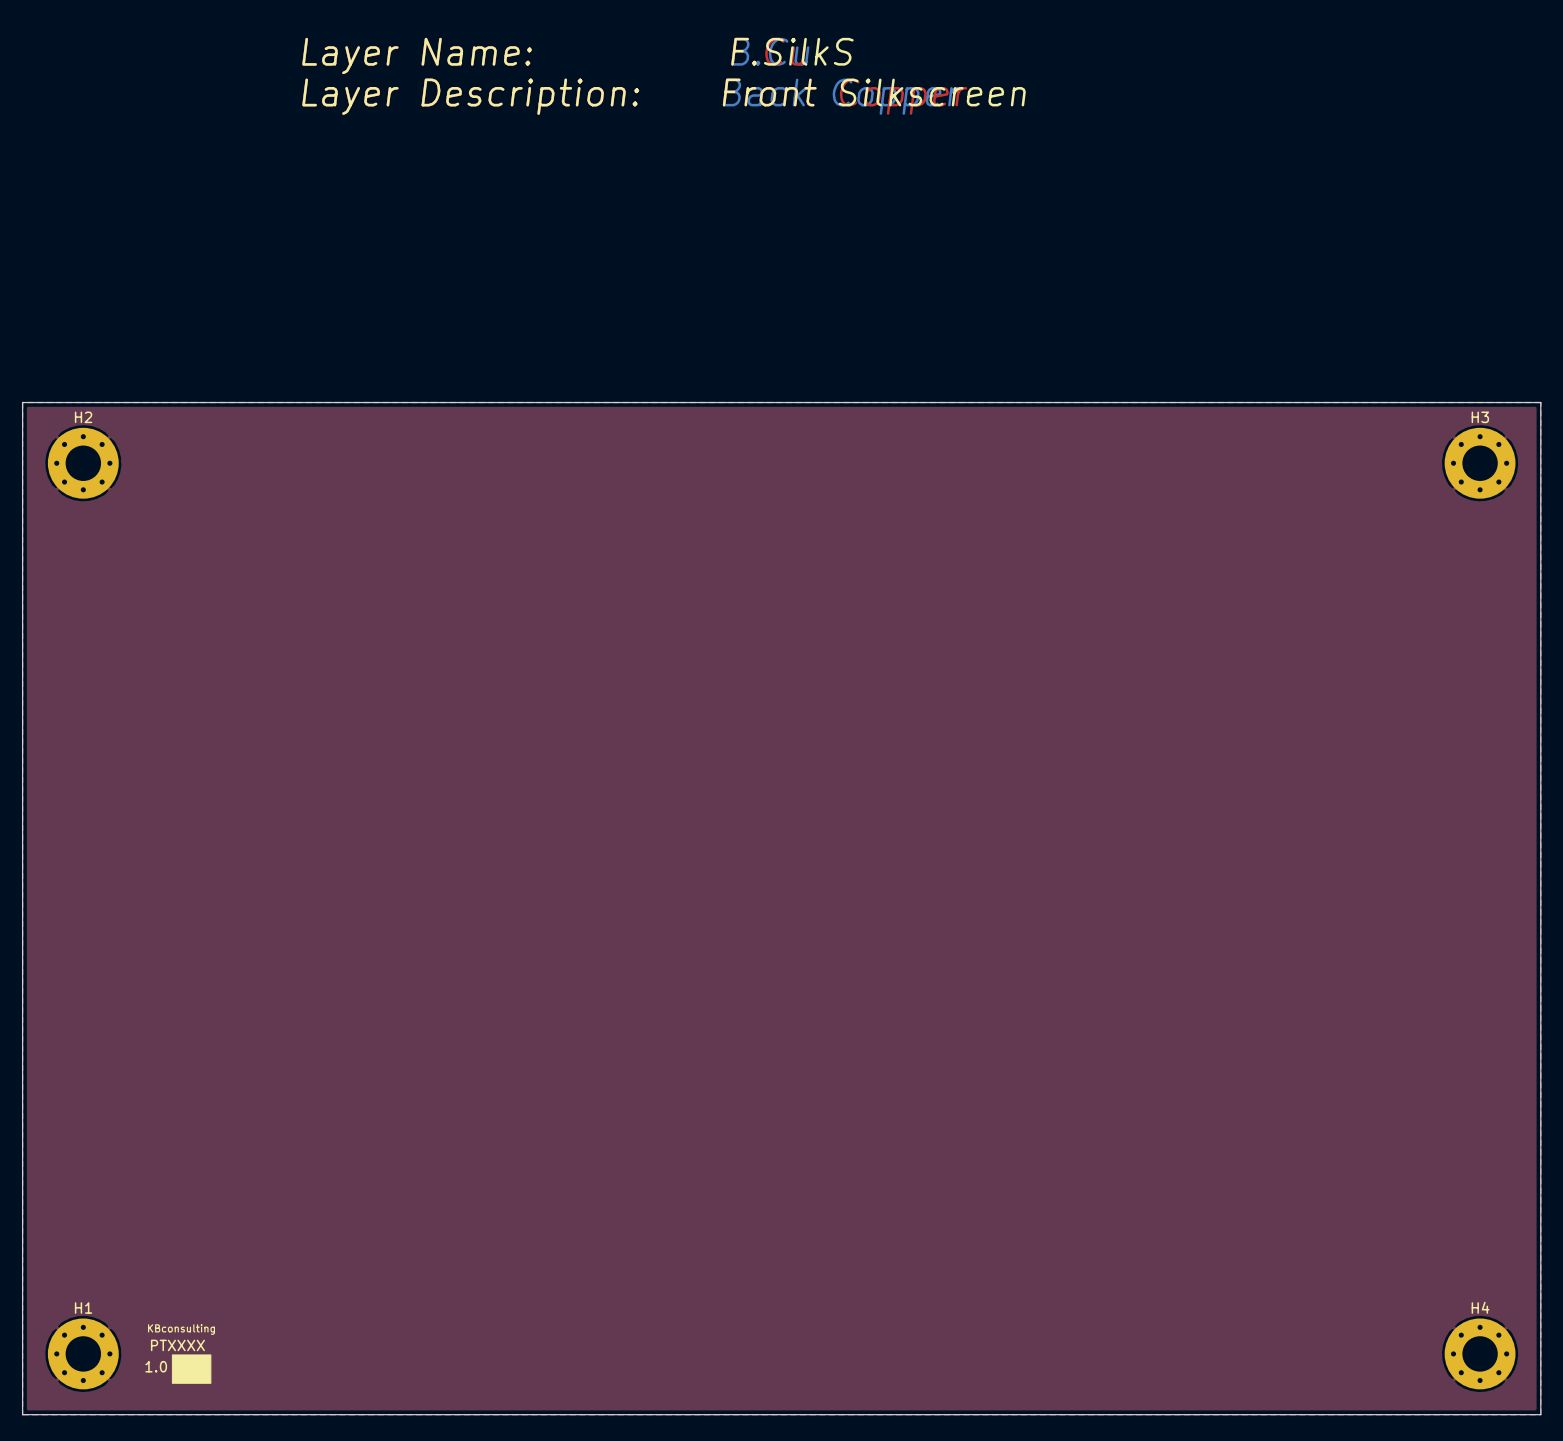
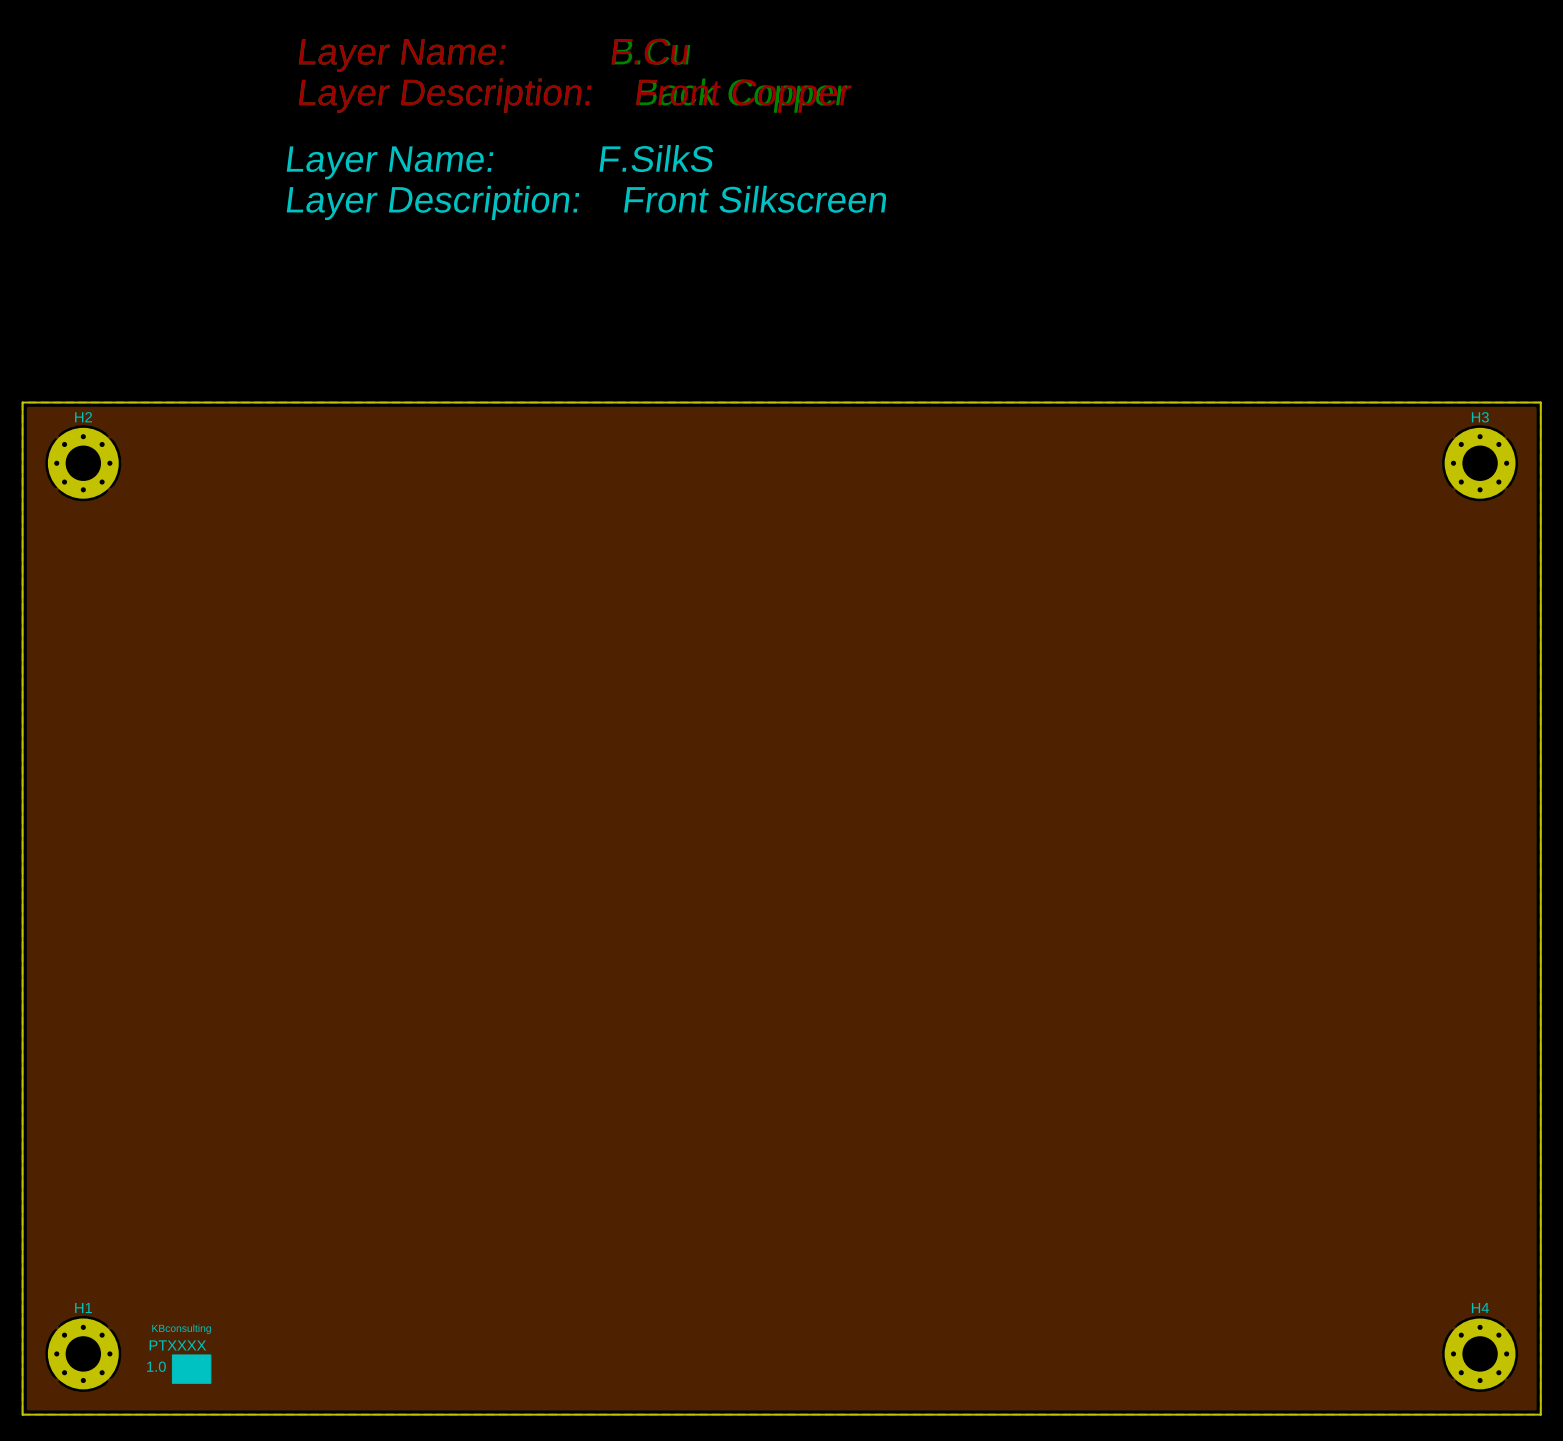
text position: Layer Name: F.SilkS (577, 55) -> Layer Name: F.SilkS (499, 162)
text position: Layer Description: Front Silkscreen (664, 96) -> Layer Description: Front Silkscreen (586, 202)

